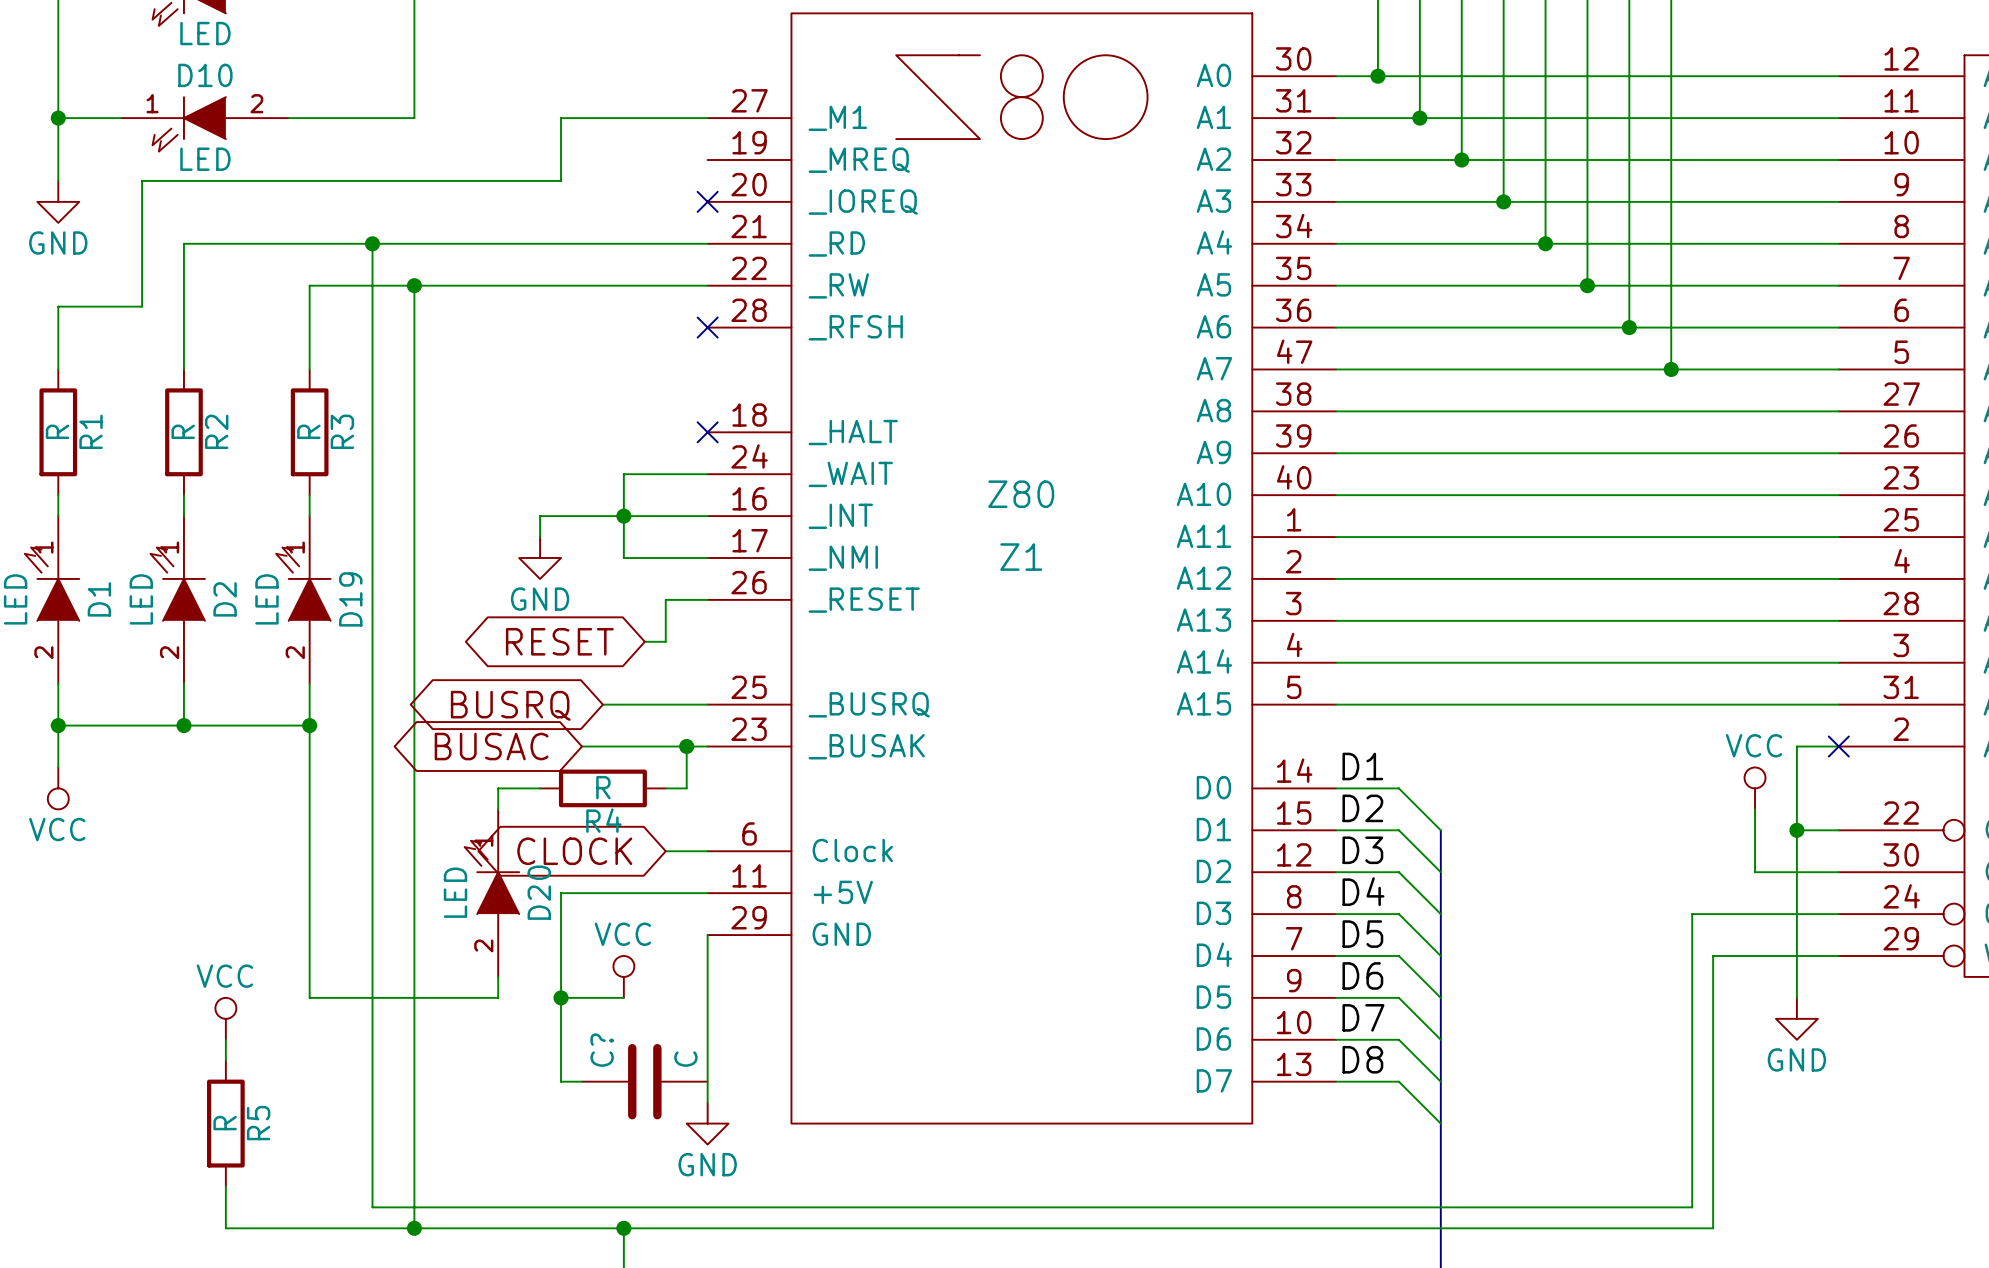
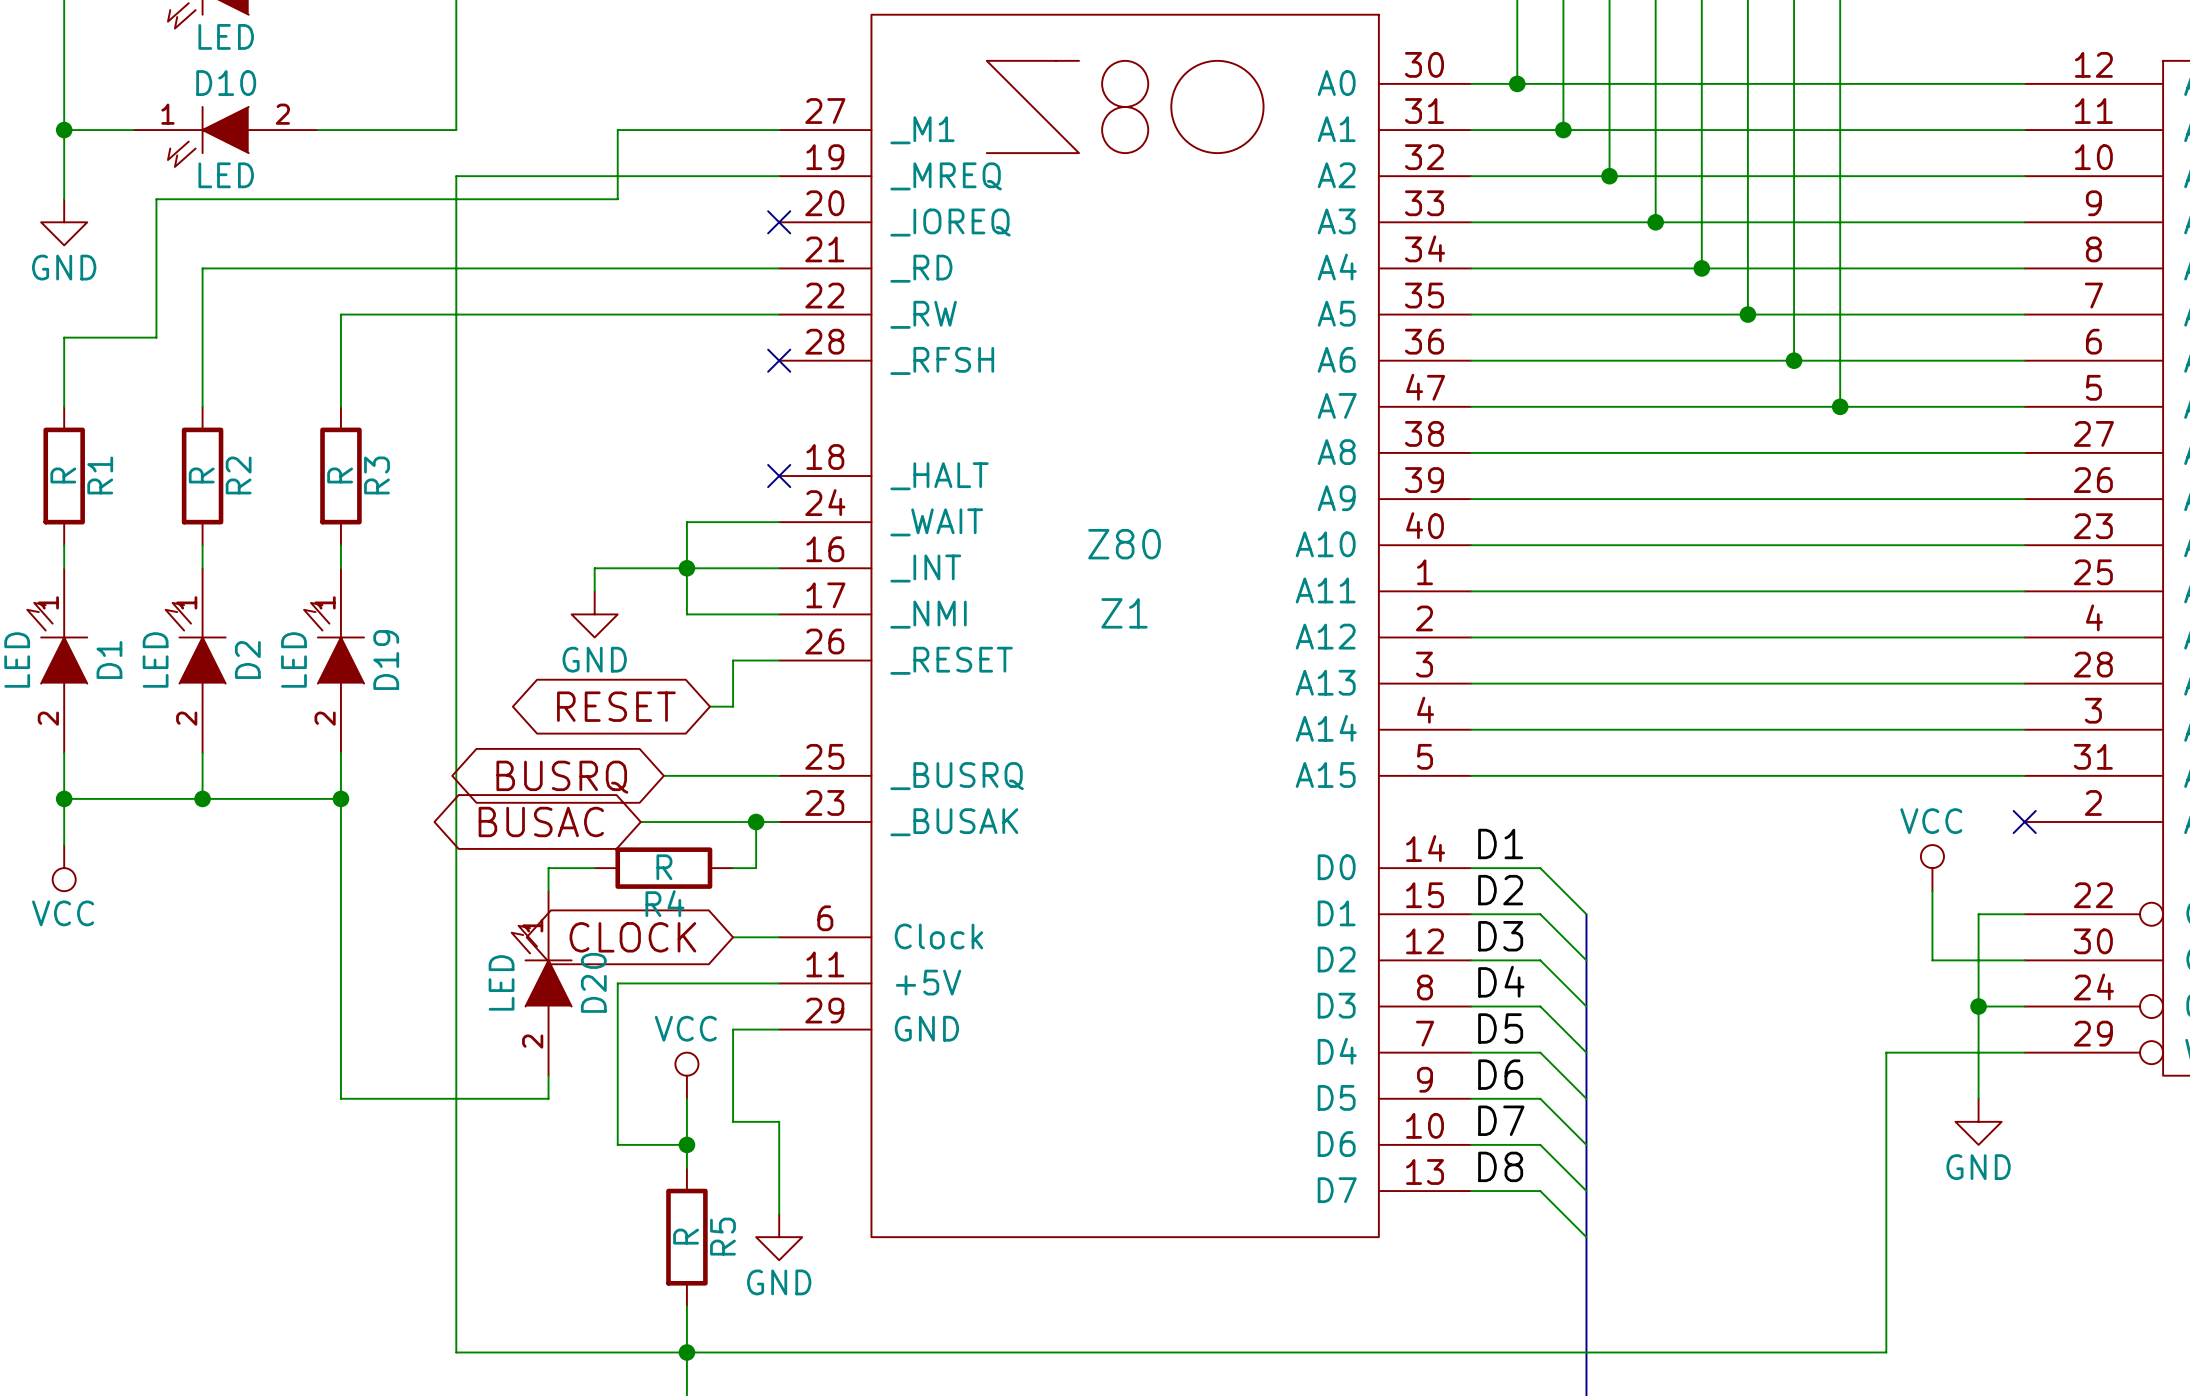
wire: none -> (779, 176) (456, 176) (456, 314)
wire: (372, 243) (372, 1207) (1692, 1207) (1692, 914) (1796, 914) -> none
junction: (372, 243) -> none
junction: (414, 285) -> none
wire: (1838, 746) (1796, 746) (1796, 830) -> none
junction position: (1796, 830) -> (1978, 1006)
wire: (707, 935) (707, 1018) -> (779, 1029) (733, 1029) (733, 1121) (779, 1121)
wire: (561, 997) (623, 997) -> (686, 1167) (686, 1098)
junction position: (561, 997) -> (686, 1144)
power symbol: VCC (225, 1018) -> none
wire: (225, 1039) (225, 1060) -> none
wire: (561, 1039) (561, 1081) (581, 1081) -> (617, 1144) (686, 1144)
C?: C (644, 1081) -> none
R5 position: (225, 1123) -> (686, 1237)
wire: (225, 1186) (225, 1228) (414, 1228) -> none
wire: none -> (686, 1306) (686, 1352)
junction: (414, 1228) -> none

